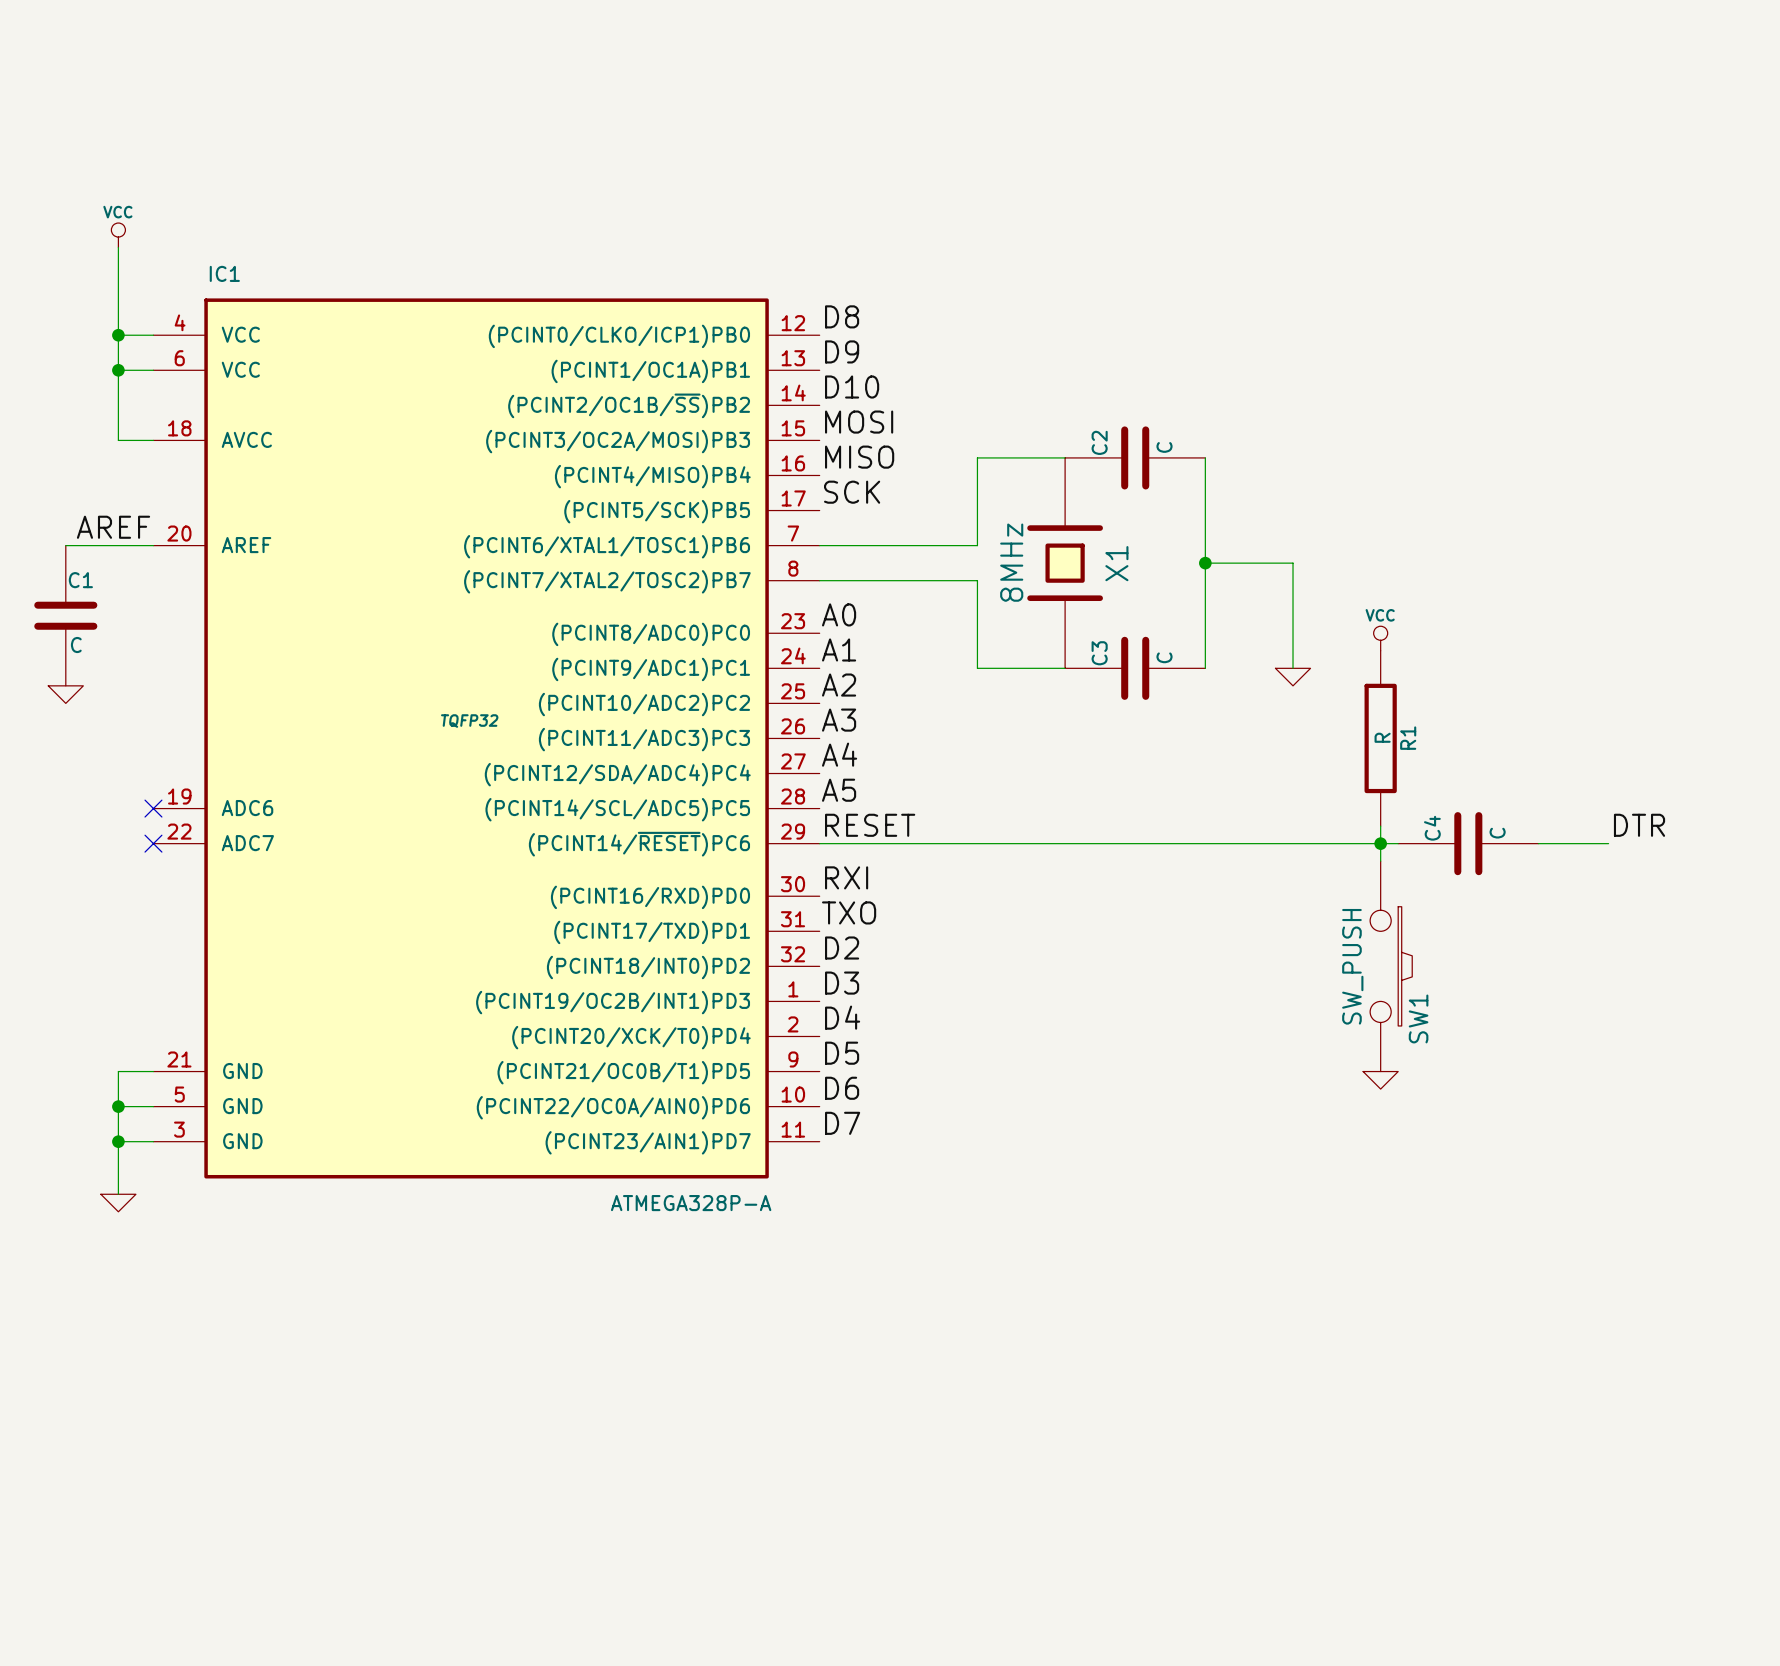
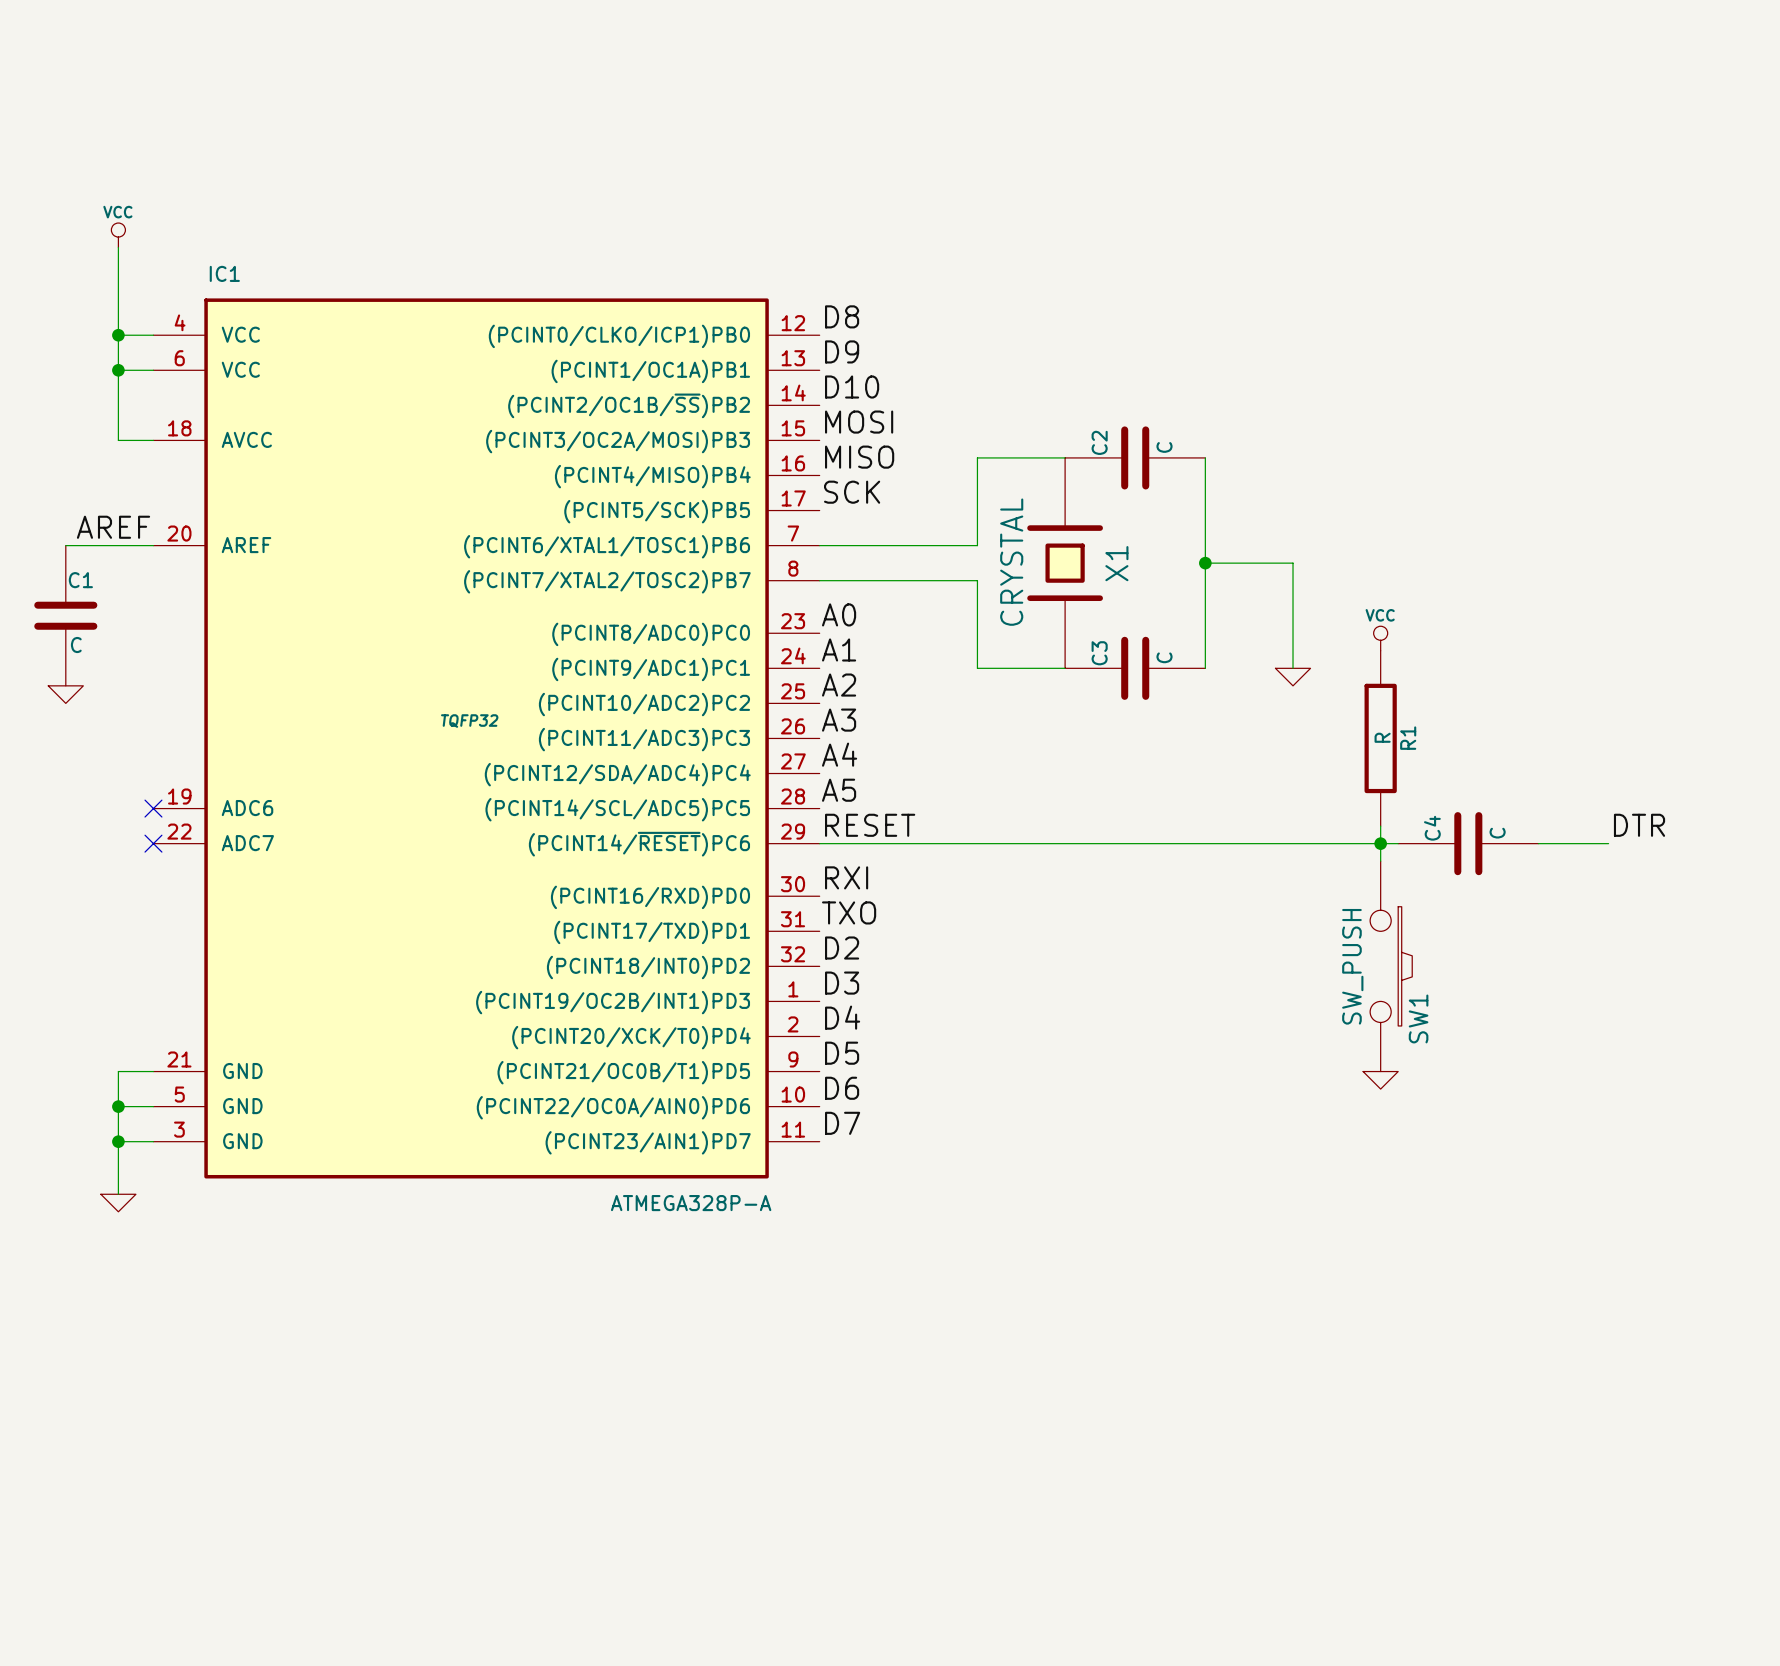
X1 value: 8MHz (1011, 562) -> CRYSTAL (1011, 562)

